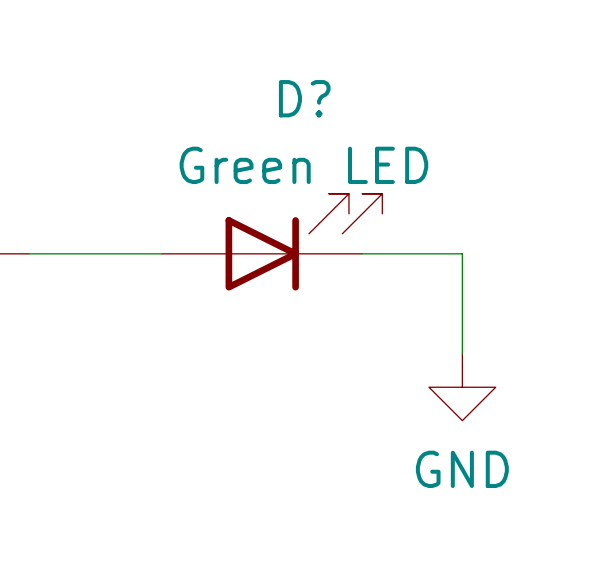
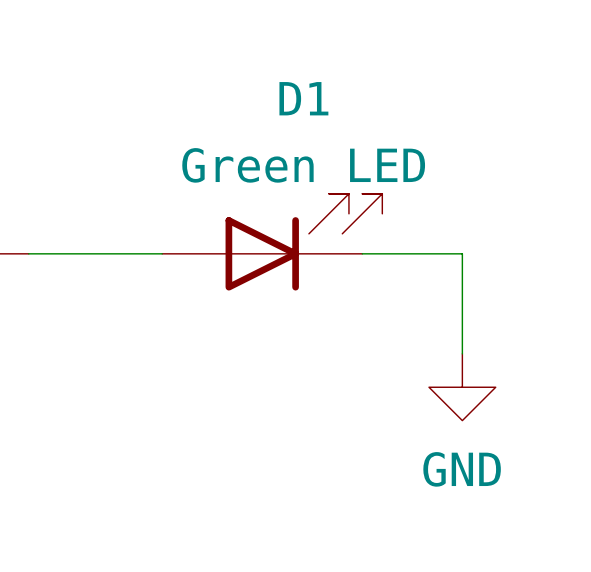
D? name: D? (304, 98) -> D1 (303, 98)

